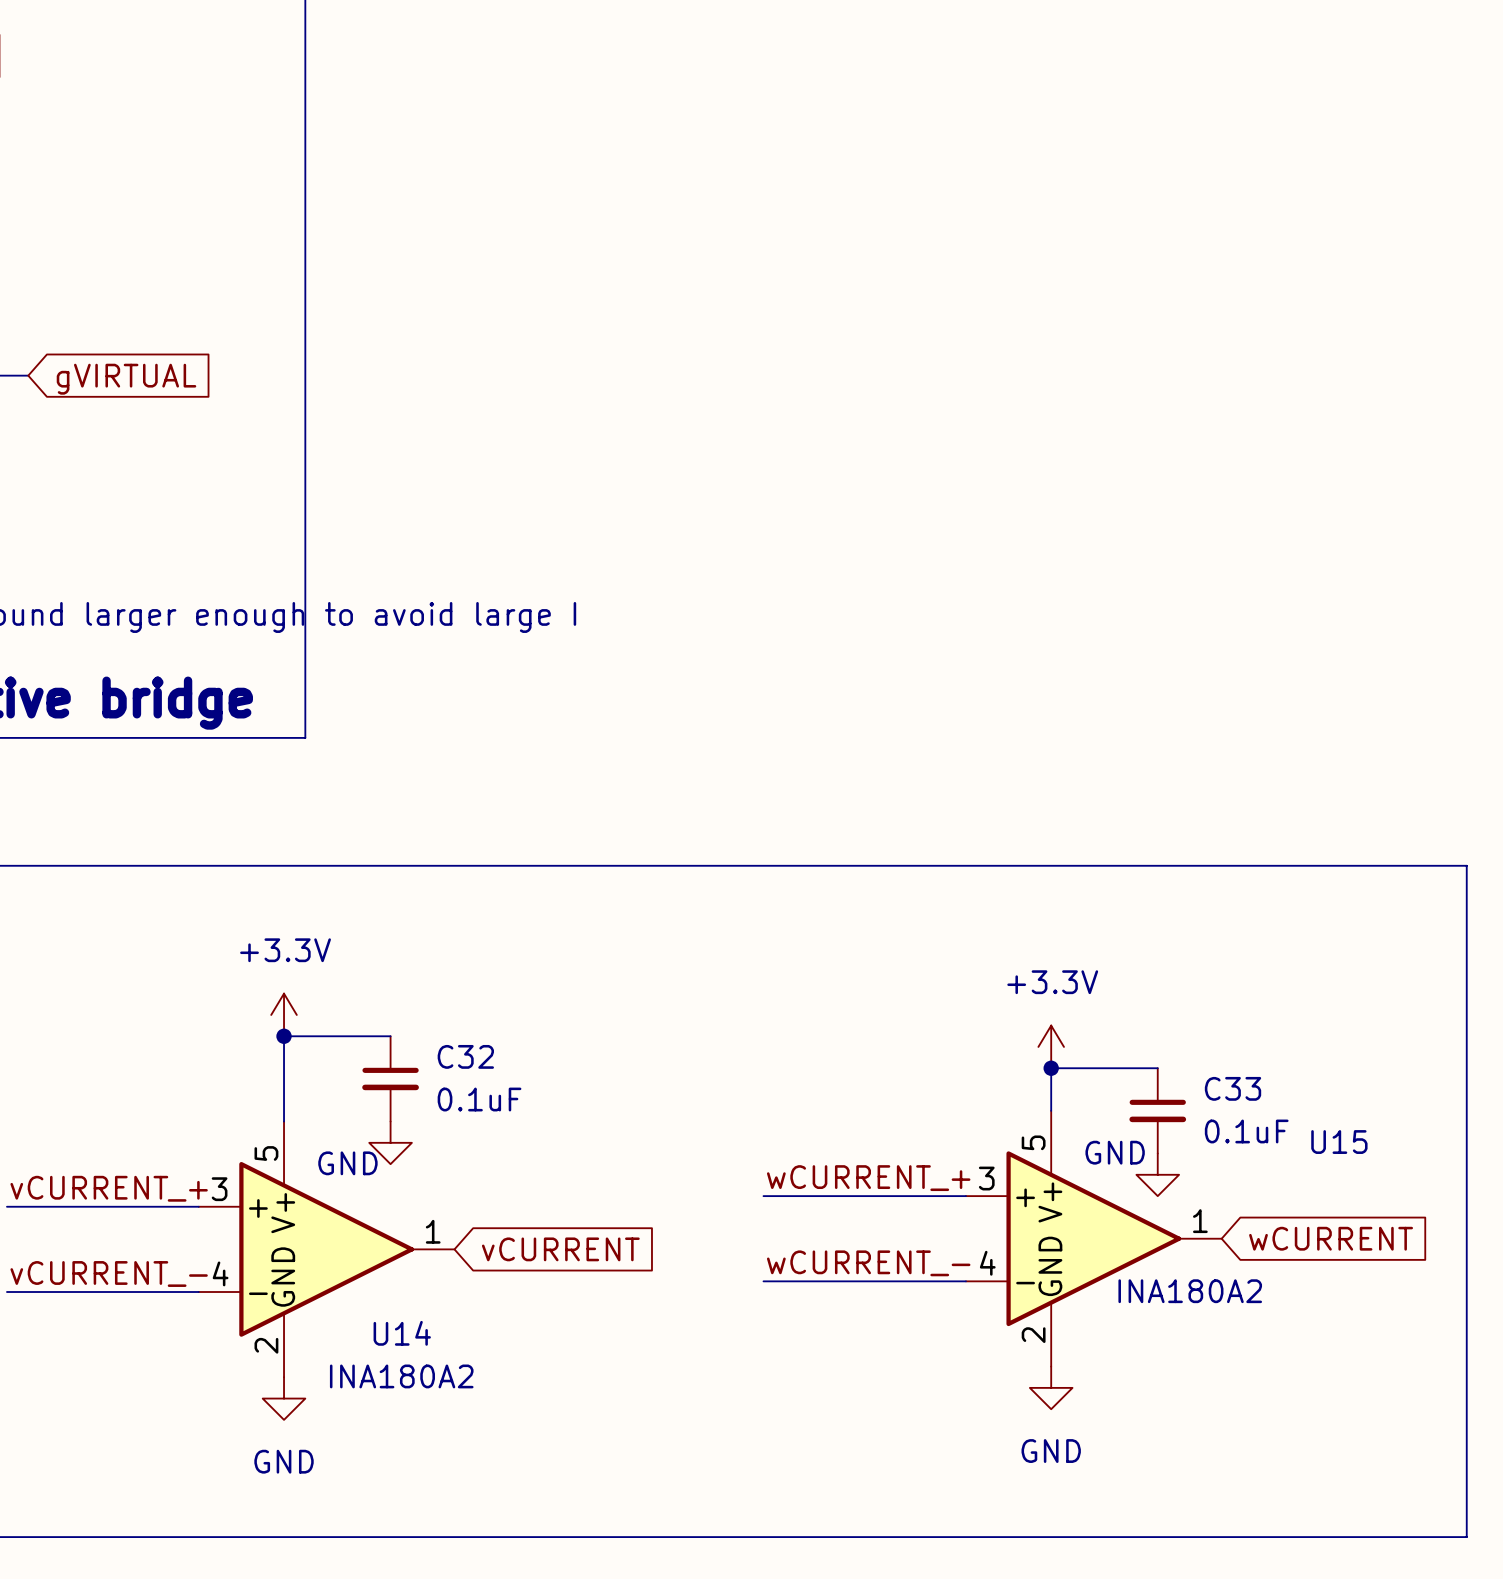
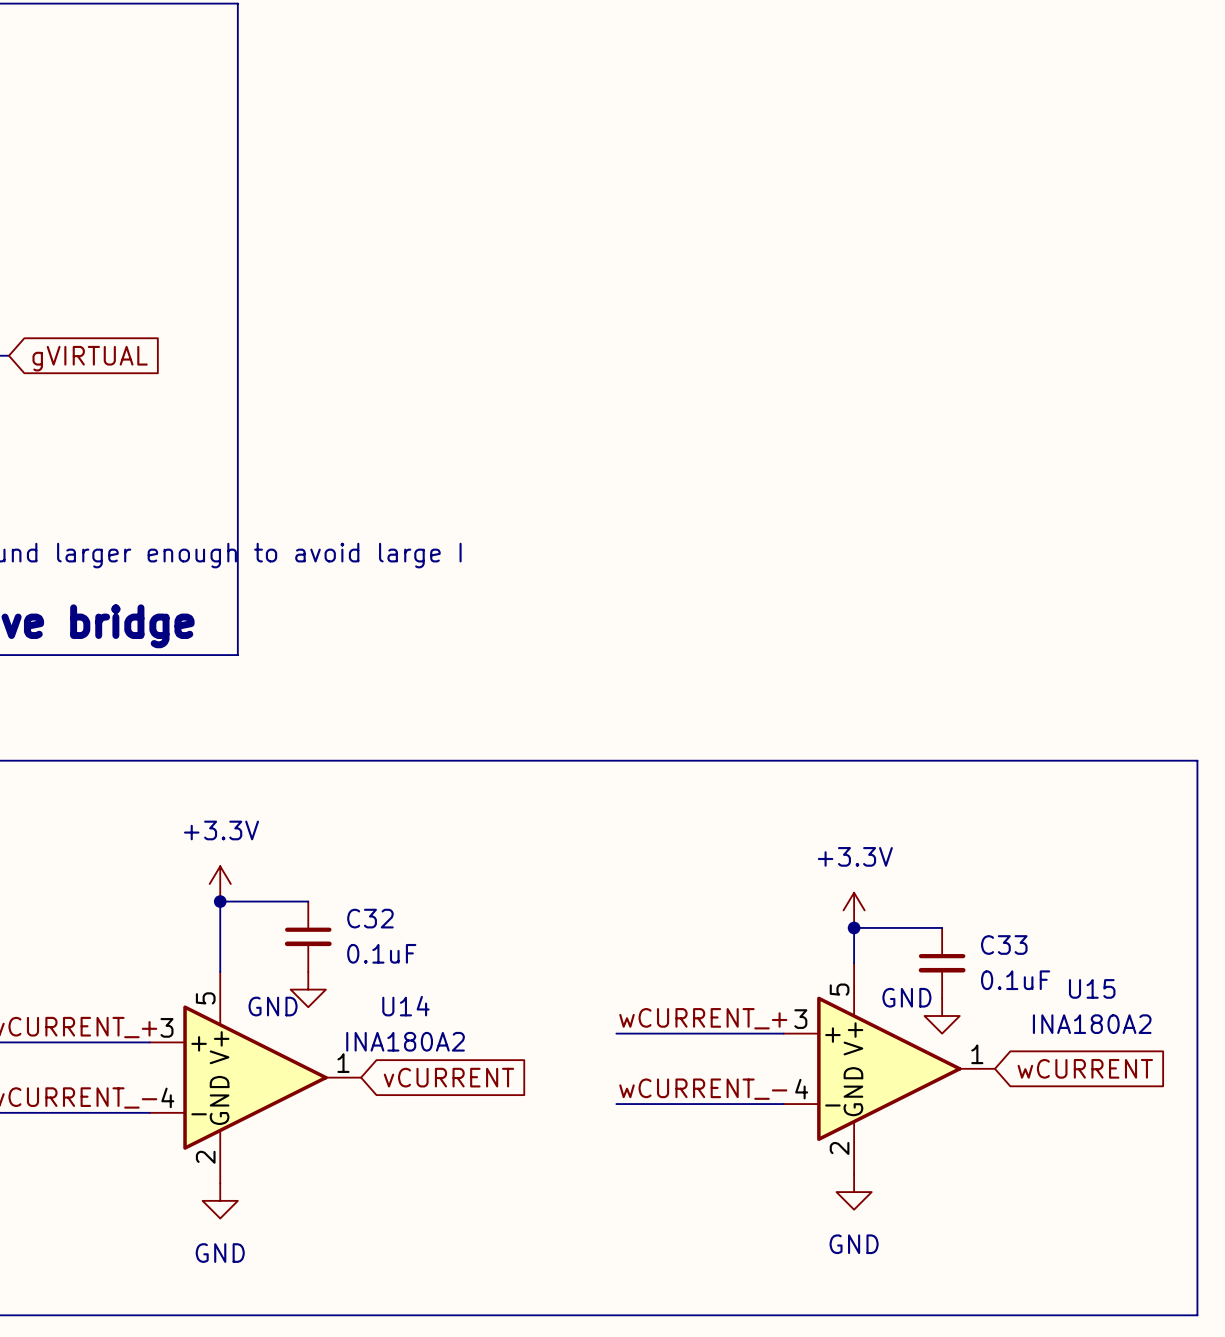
U15 value position: INA180A2 (1190, 1291) -> INA180A2 (1092, 1024)
U14 name position: U14 (402, 1333) -> U14 (405, 1006)
U14 value position: INA180A2 (401, 1376) -> INA180A2 (405, 1041)

